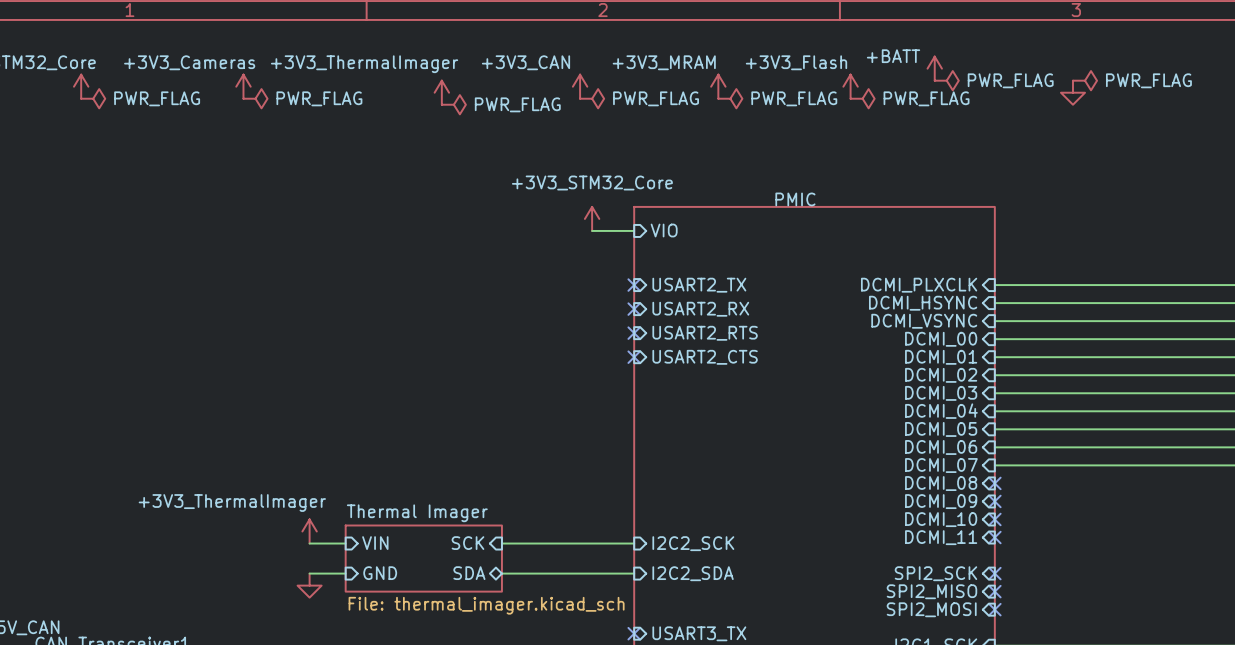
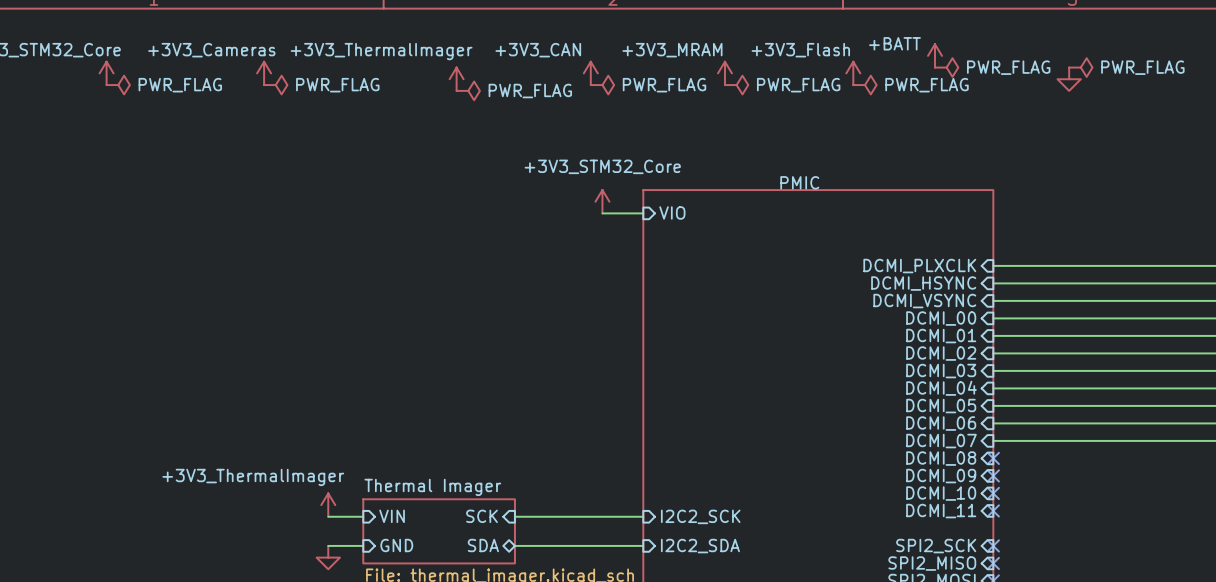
no-connect mark: (634, 285) -> none
sheet pin: USART2_TX (699, 285) -> none
no-connect mark: (634, 309) -> none
sheet pin: USART2_RX (700, 309) -> none
no-connect mark: (634, 333) -> none
sheet pin: USART2_RTS (705, 333) -> none
no-connect mark: (634, 357) -> none
sheet pin: USART2_CTS (705, 357) -> none

